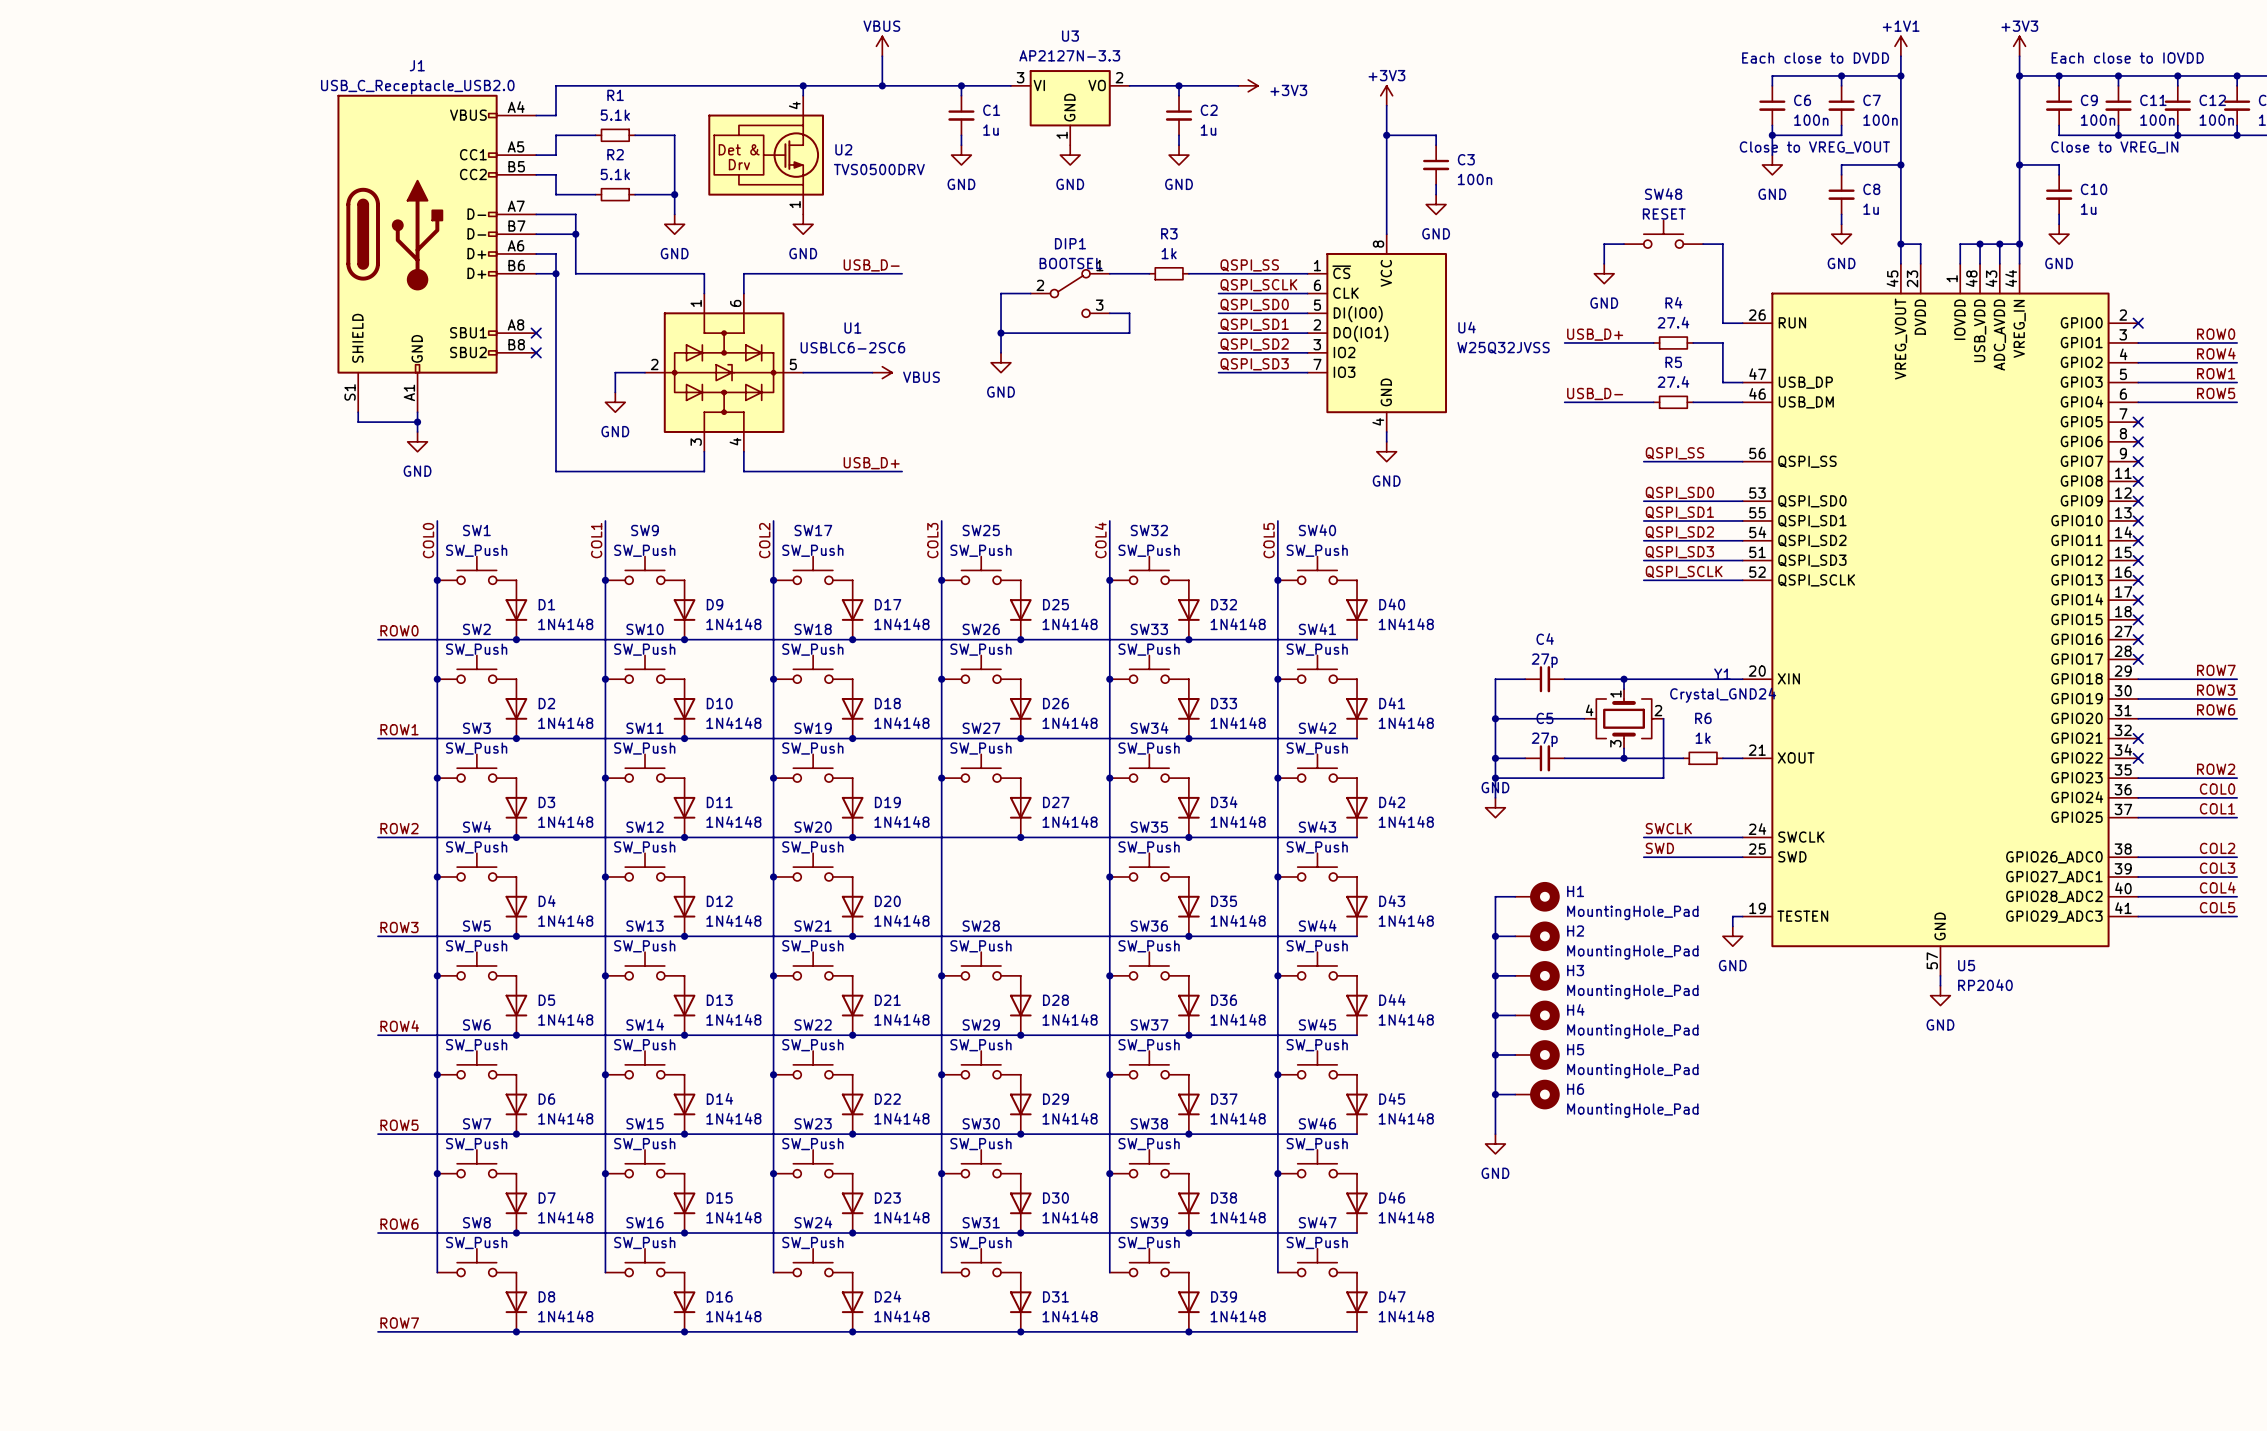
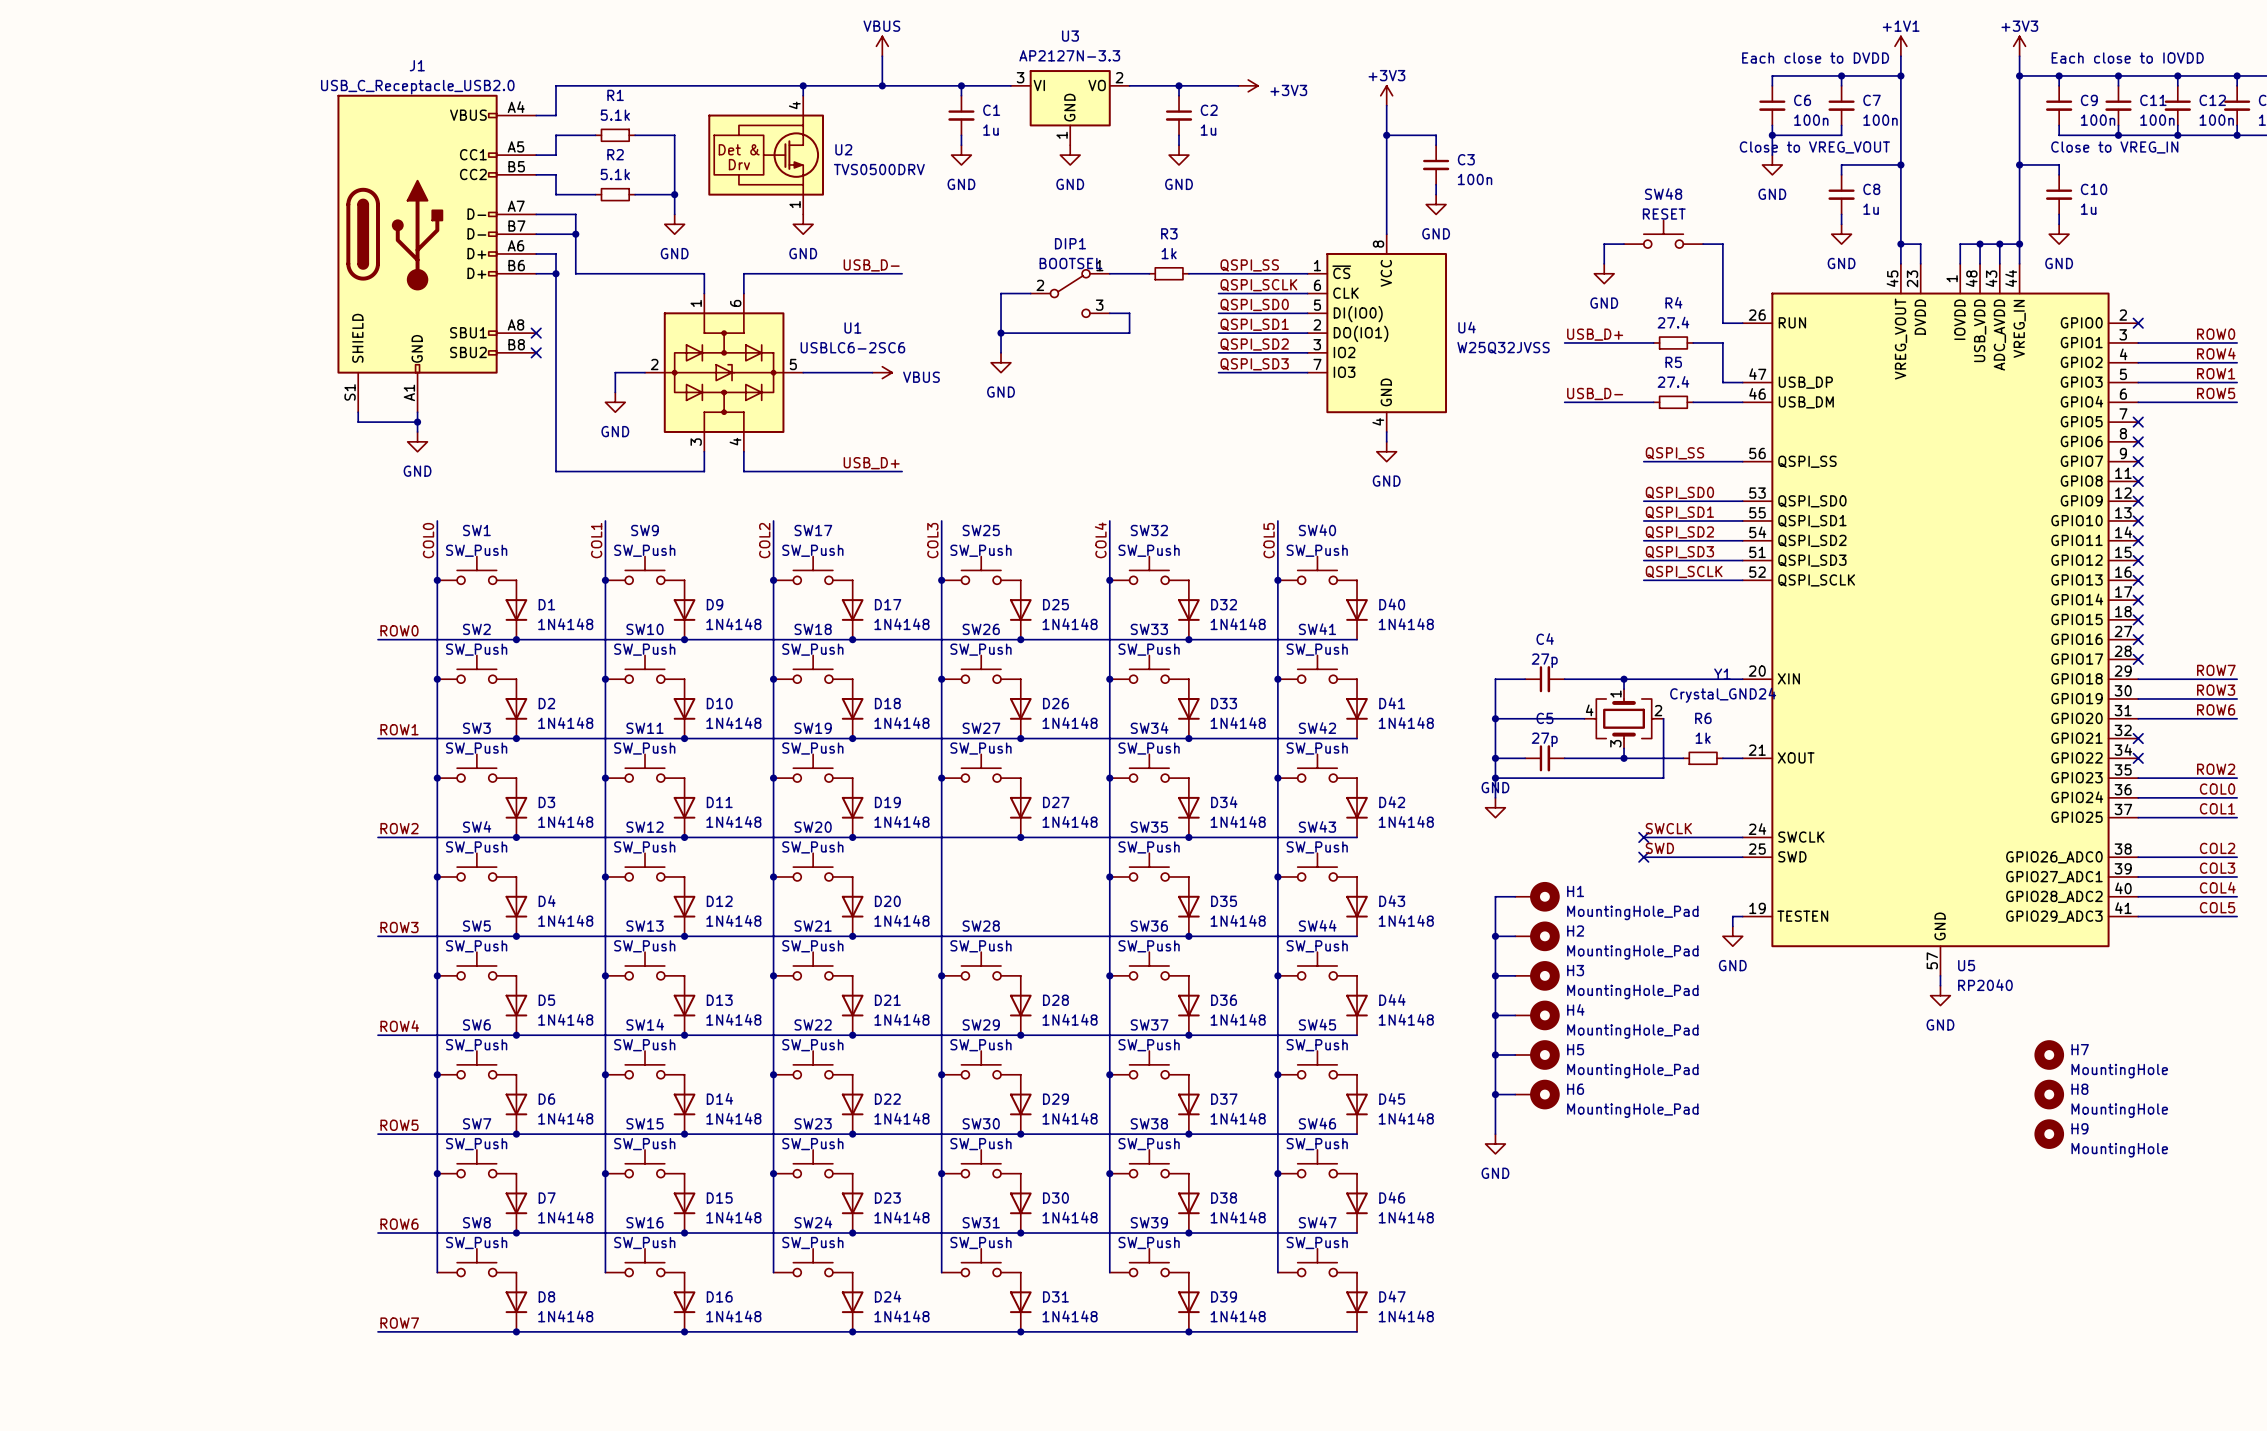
no-connect mark: none -> (1643, 837)
no-connect mark: none -> (1643, 857)
H7: none -> MountingHole (2049, 1055)
H8: none -> MountingHole (2049, 1094)
H9: none -> MountingHole (2049, 1134)

